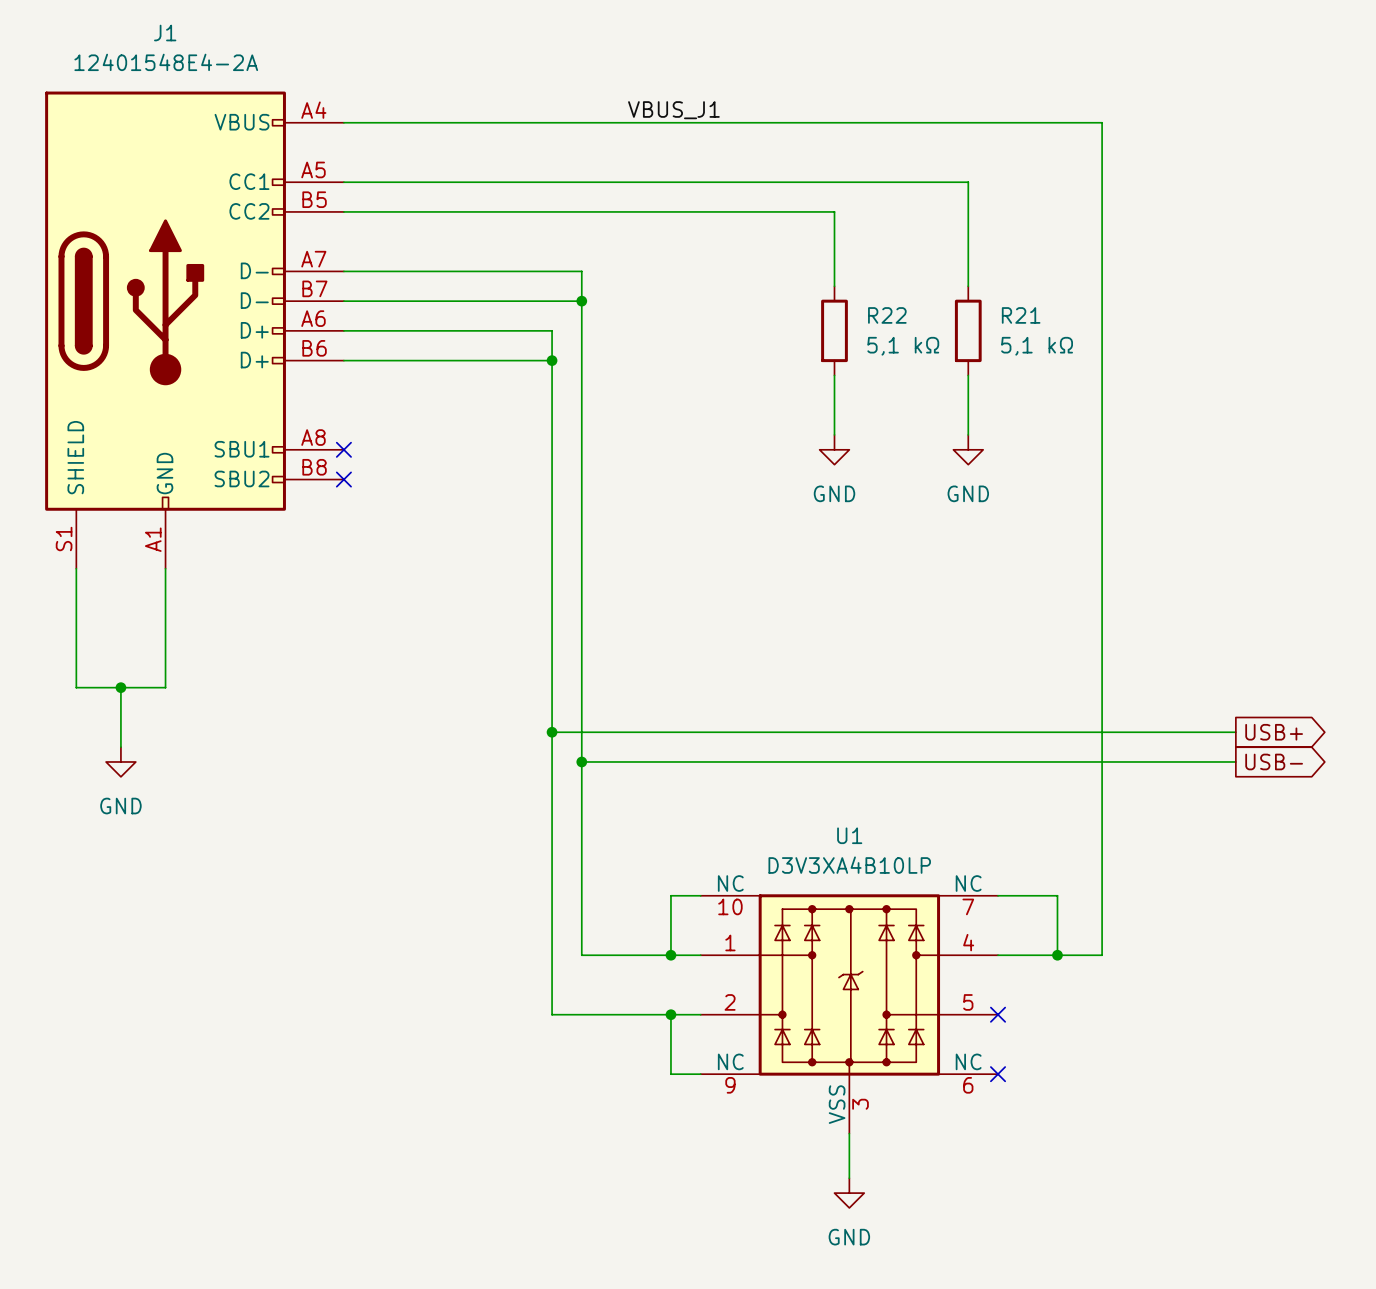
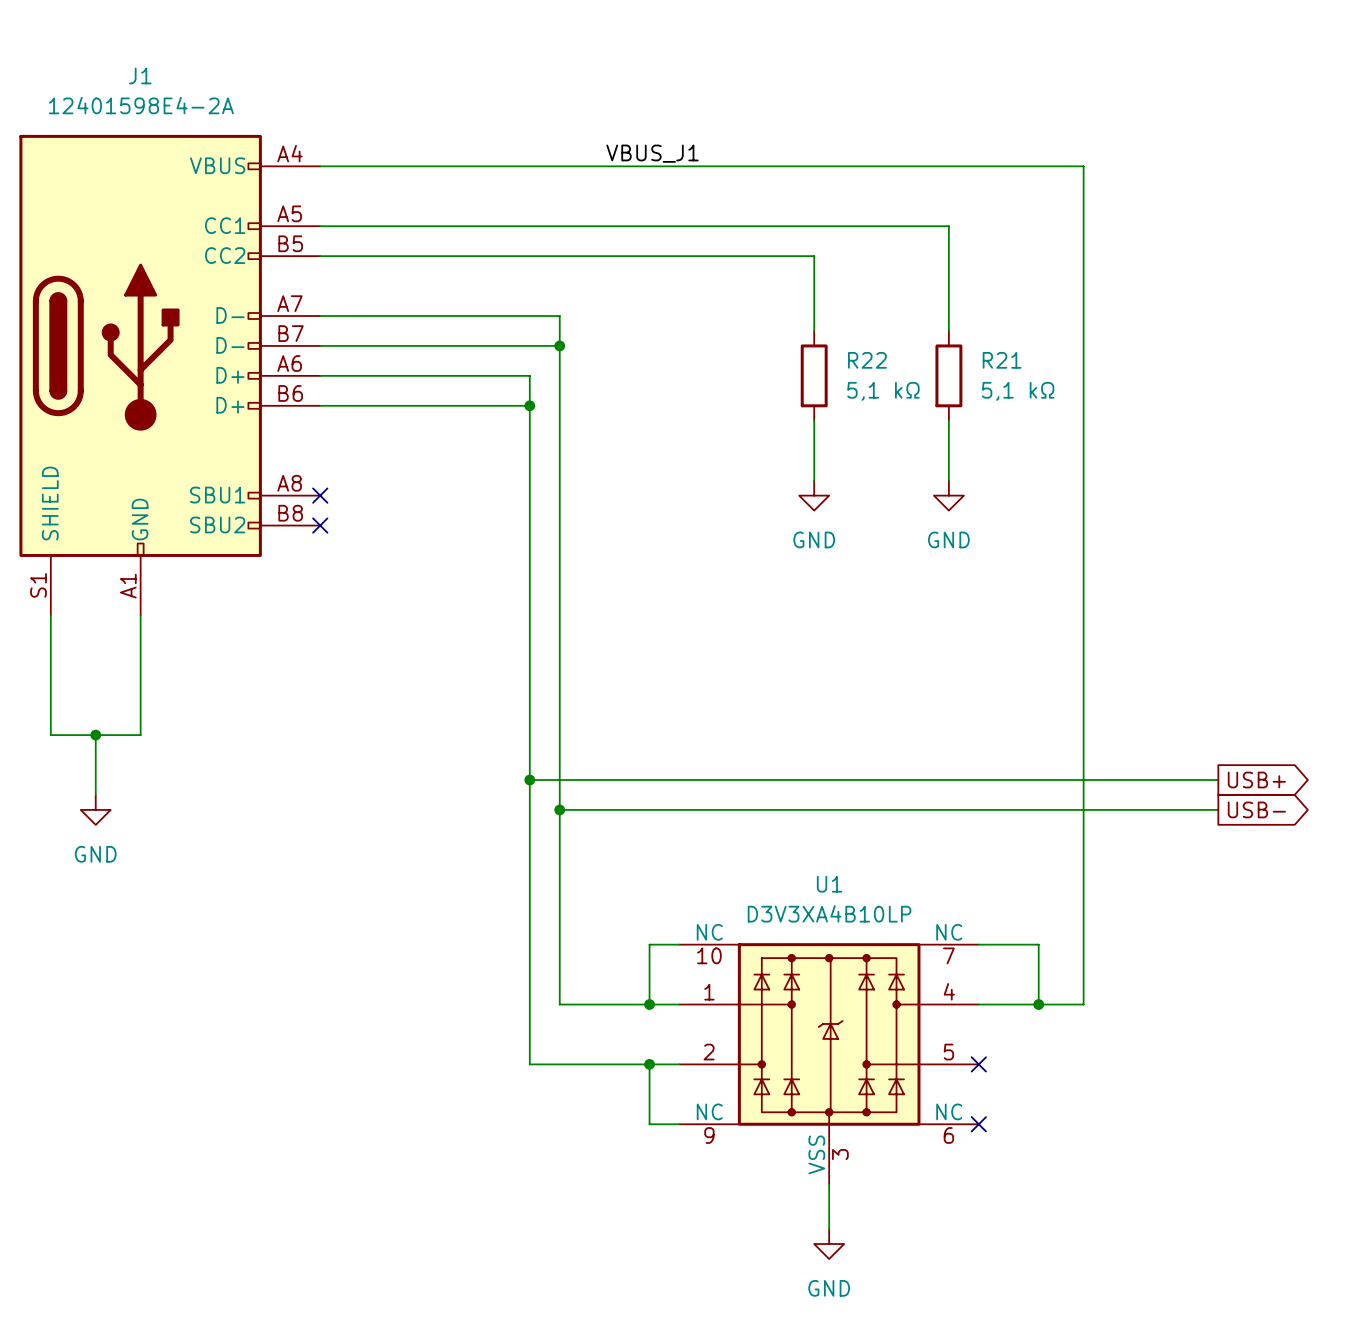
J1 value: 12401548E4-2A (166, 62) -> 12401598E4-2A (141, 105)

